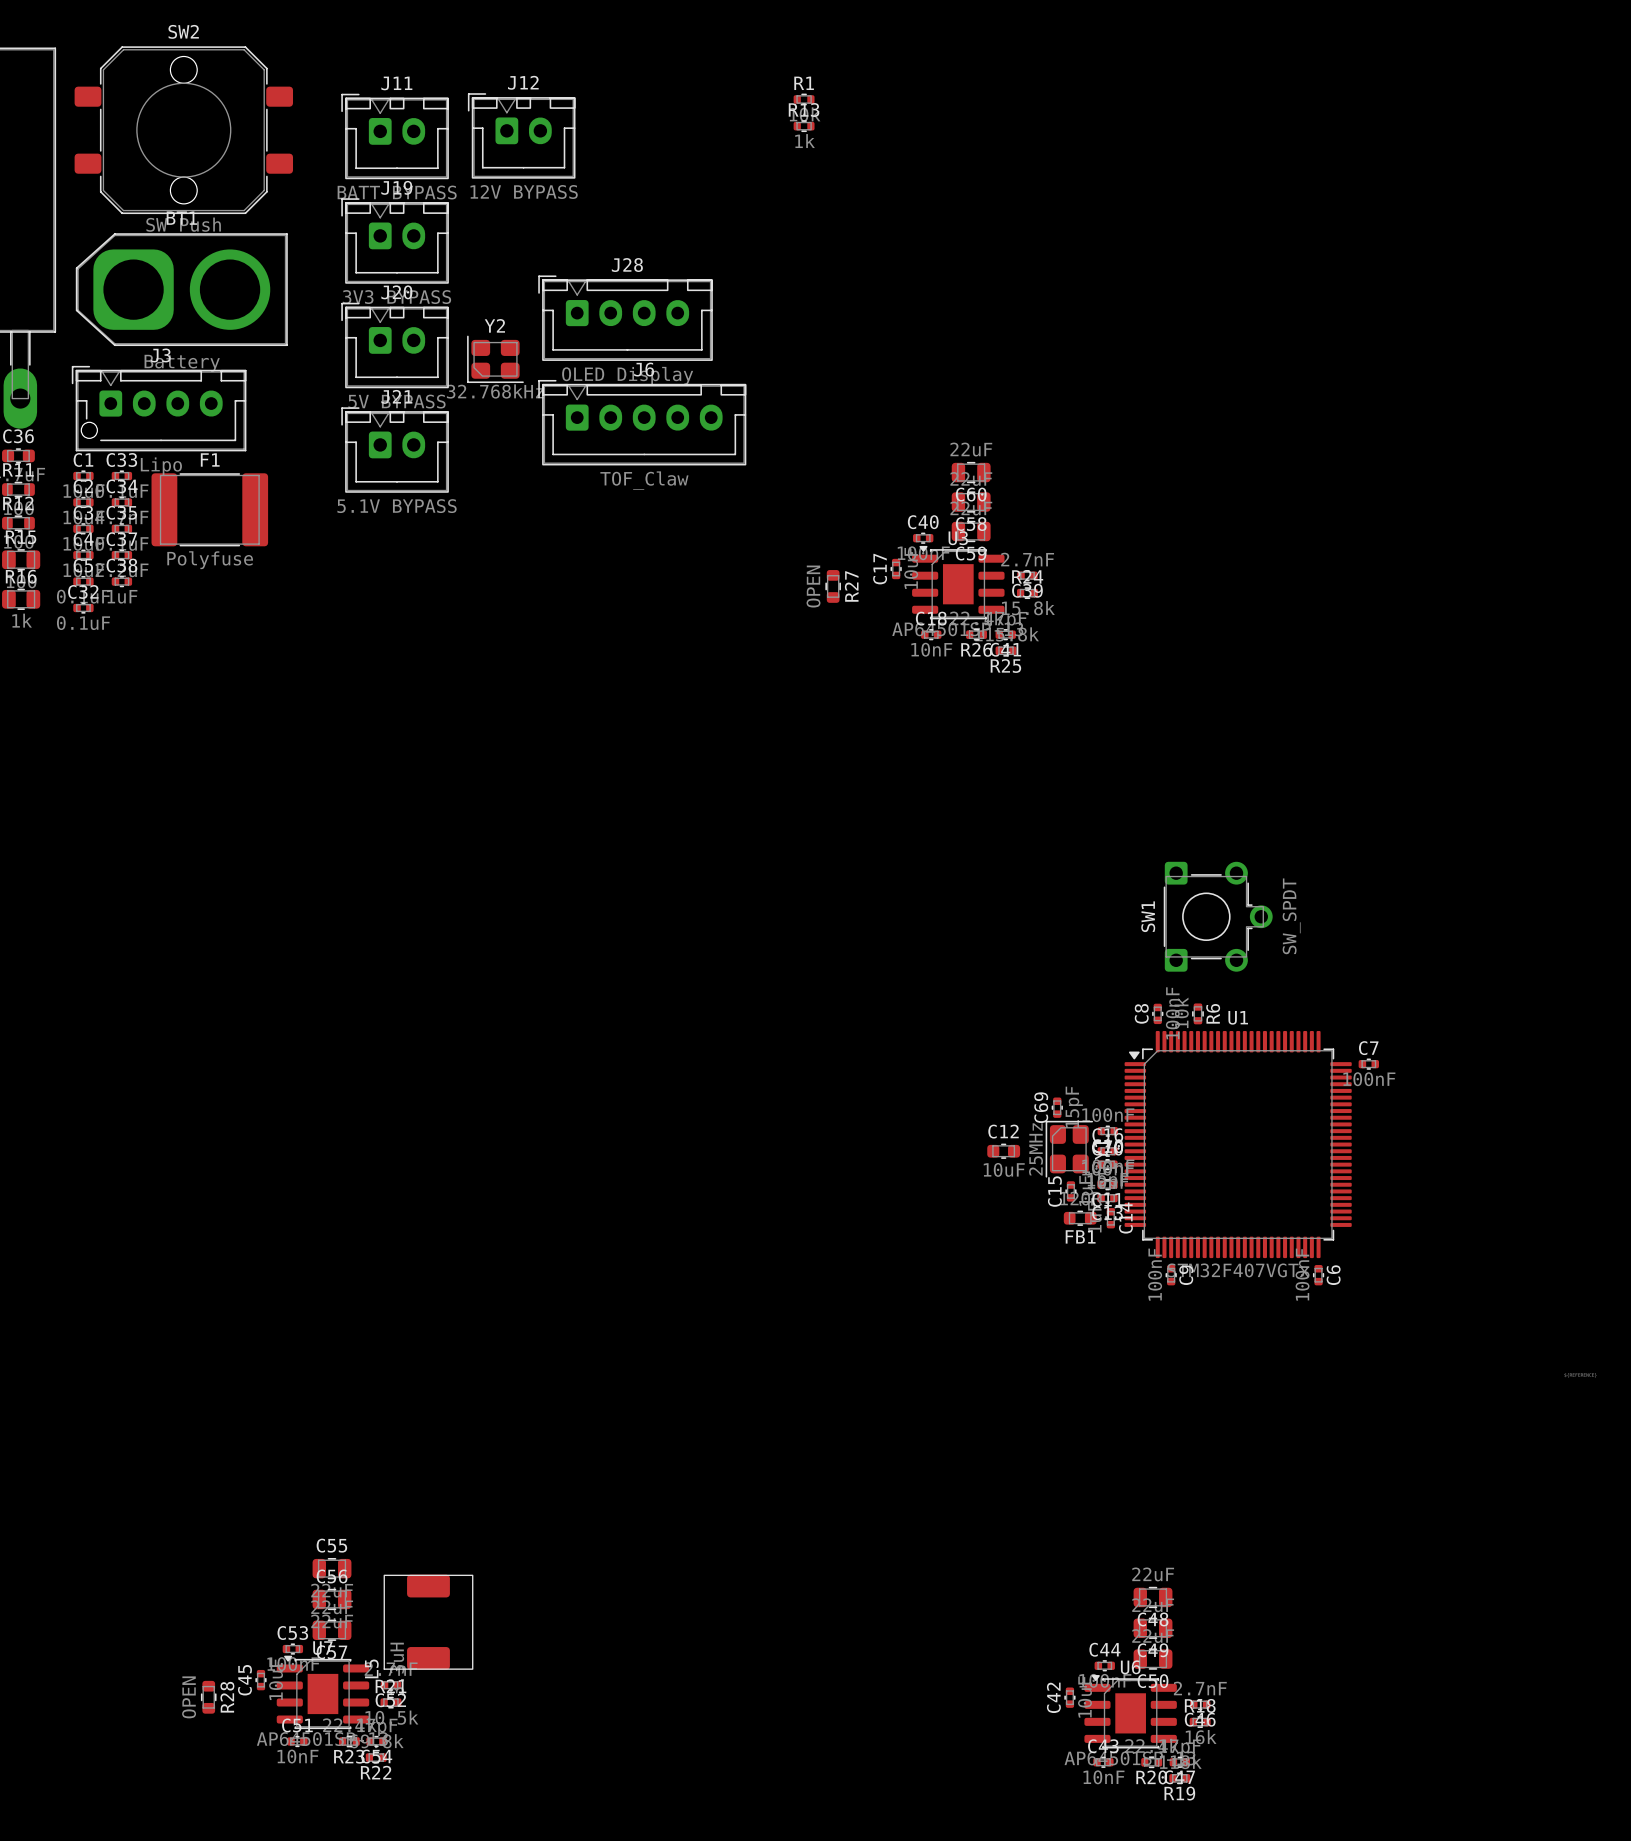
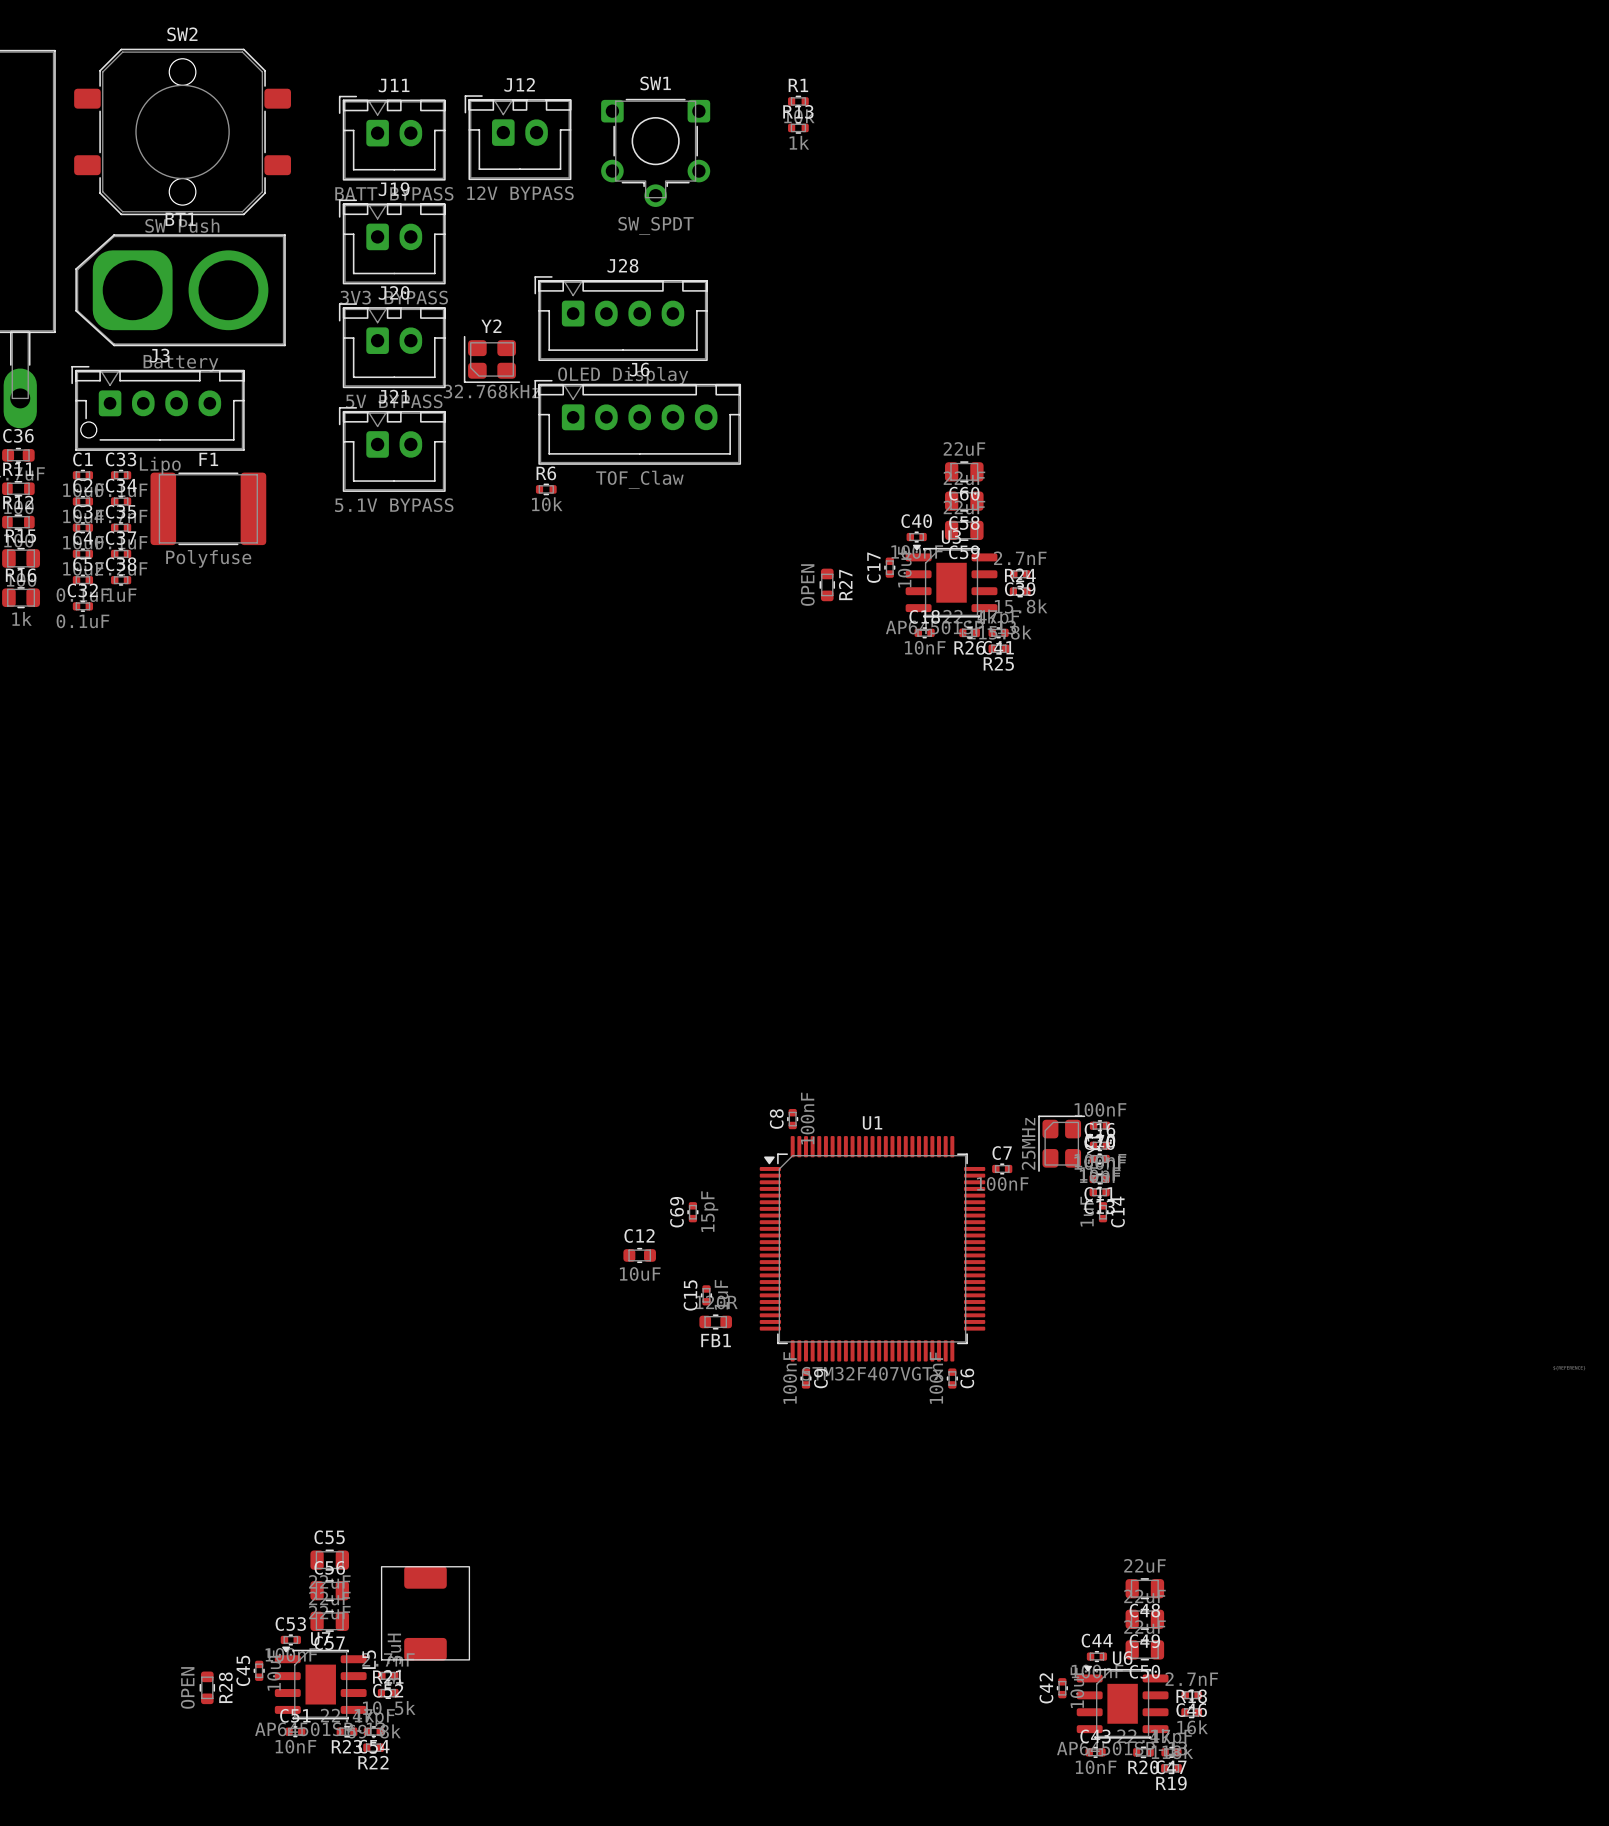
SW1 rotation: 0° (1218, 916) -> 90° clockwise (655, 152)
SW1 position: (1218, 916) -> (655, 152)
C8 position: (1157, 1013) -> (792, 1119)
R6 rotation: 0° (1197, 1013) -> 90° clockwise (546, 489)
R6 position: (1197, 1013) -> (546, 489)
C7 position: (1368, 1064) -> (1002, 1168)
C69 position: (1057, 1107) -> (692, 1212)
U1 position: (1238, 1144) -> (872, 1248)
C12 position: (1003, 1151) -> (639, 1255)
C15 position: (1070, 1191) -> (706, 1295)
FB1 position: (1080, 1218) -> (715, 1321)
C9 position: (1171, 1275) -> (805, 1378)
C6 position: (1318, 1275) -> (952, 1378)

